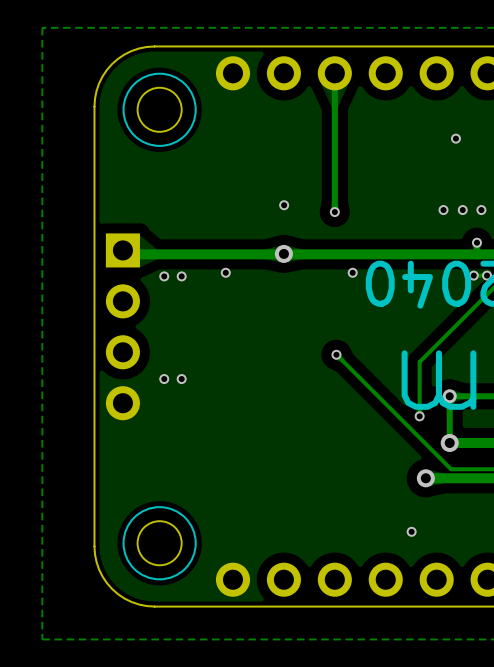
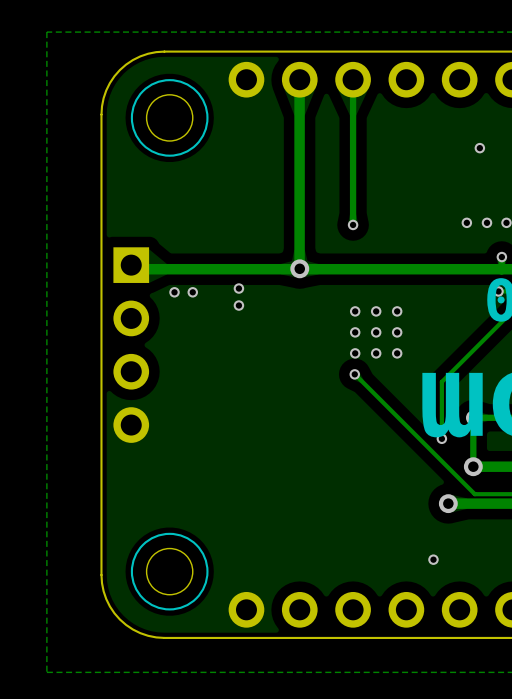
track: none -> (299, 79) (299, 268)
via: (284, 205) -> none
via: (352, 272) -> none
via: none -> (238, 305)
via: none -> (355, 311)
via: none -> (376, 311)
via: none -> (397, 311)
via: none -> (355, 332)
via: none -> (376, 332)
via: none -> (397, 332)
via: none -> (355, 353)
via: none -> (376, 353)
via: none -> (397, 353)
via: (164, 379) -> none
via: (181, 379) -> none

